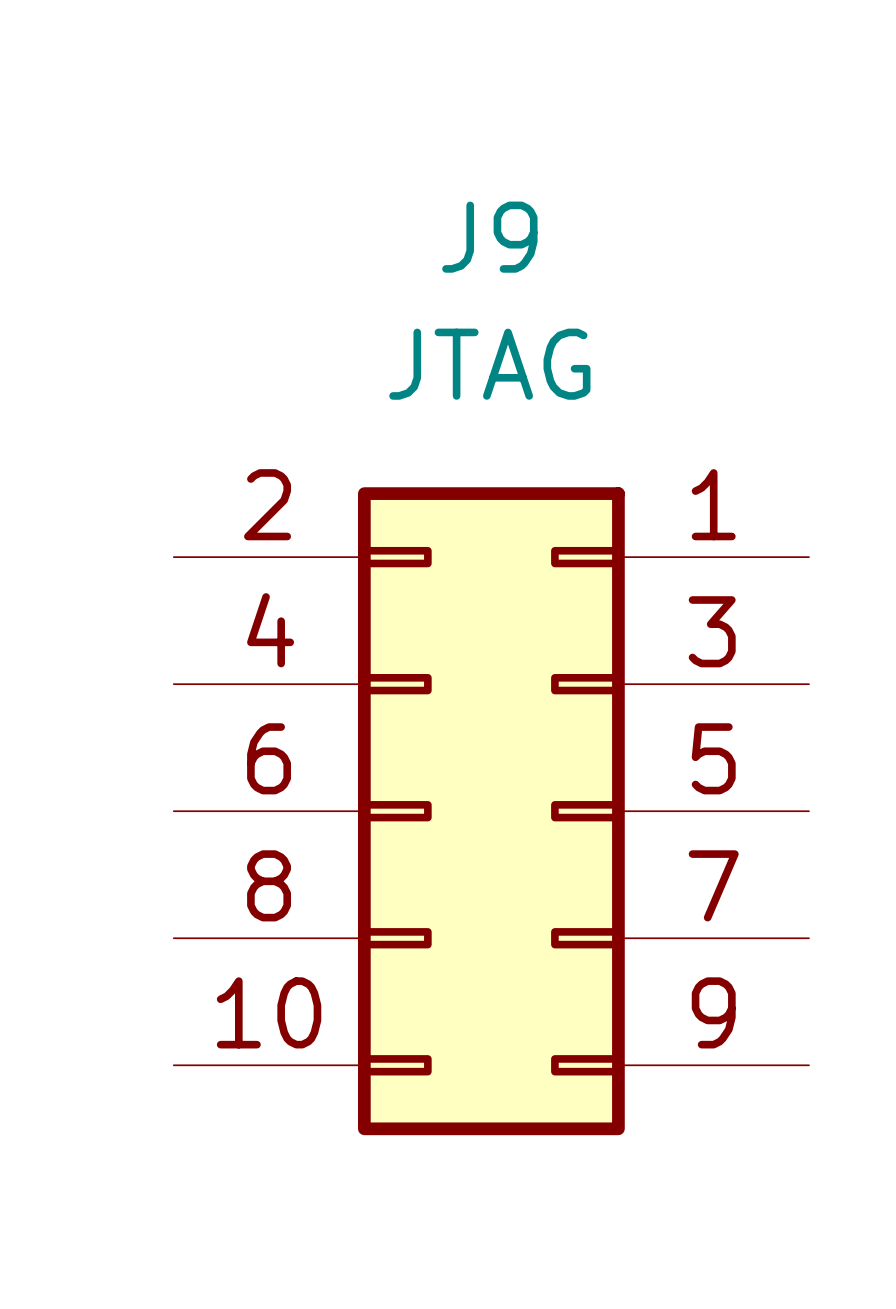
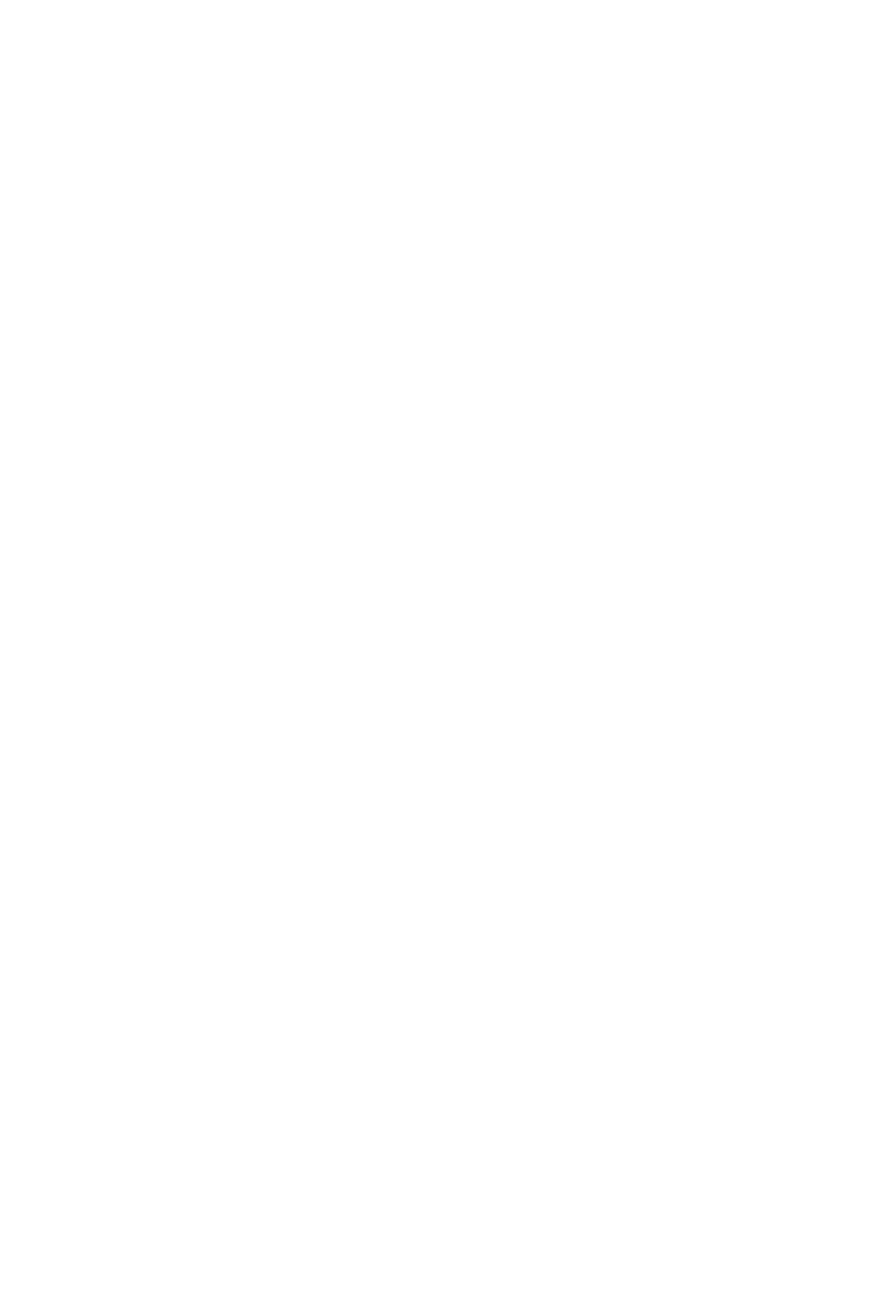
J9: JTAG (491, 811) -> none

